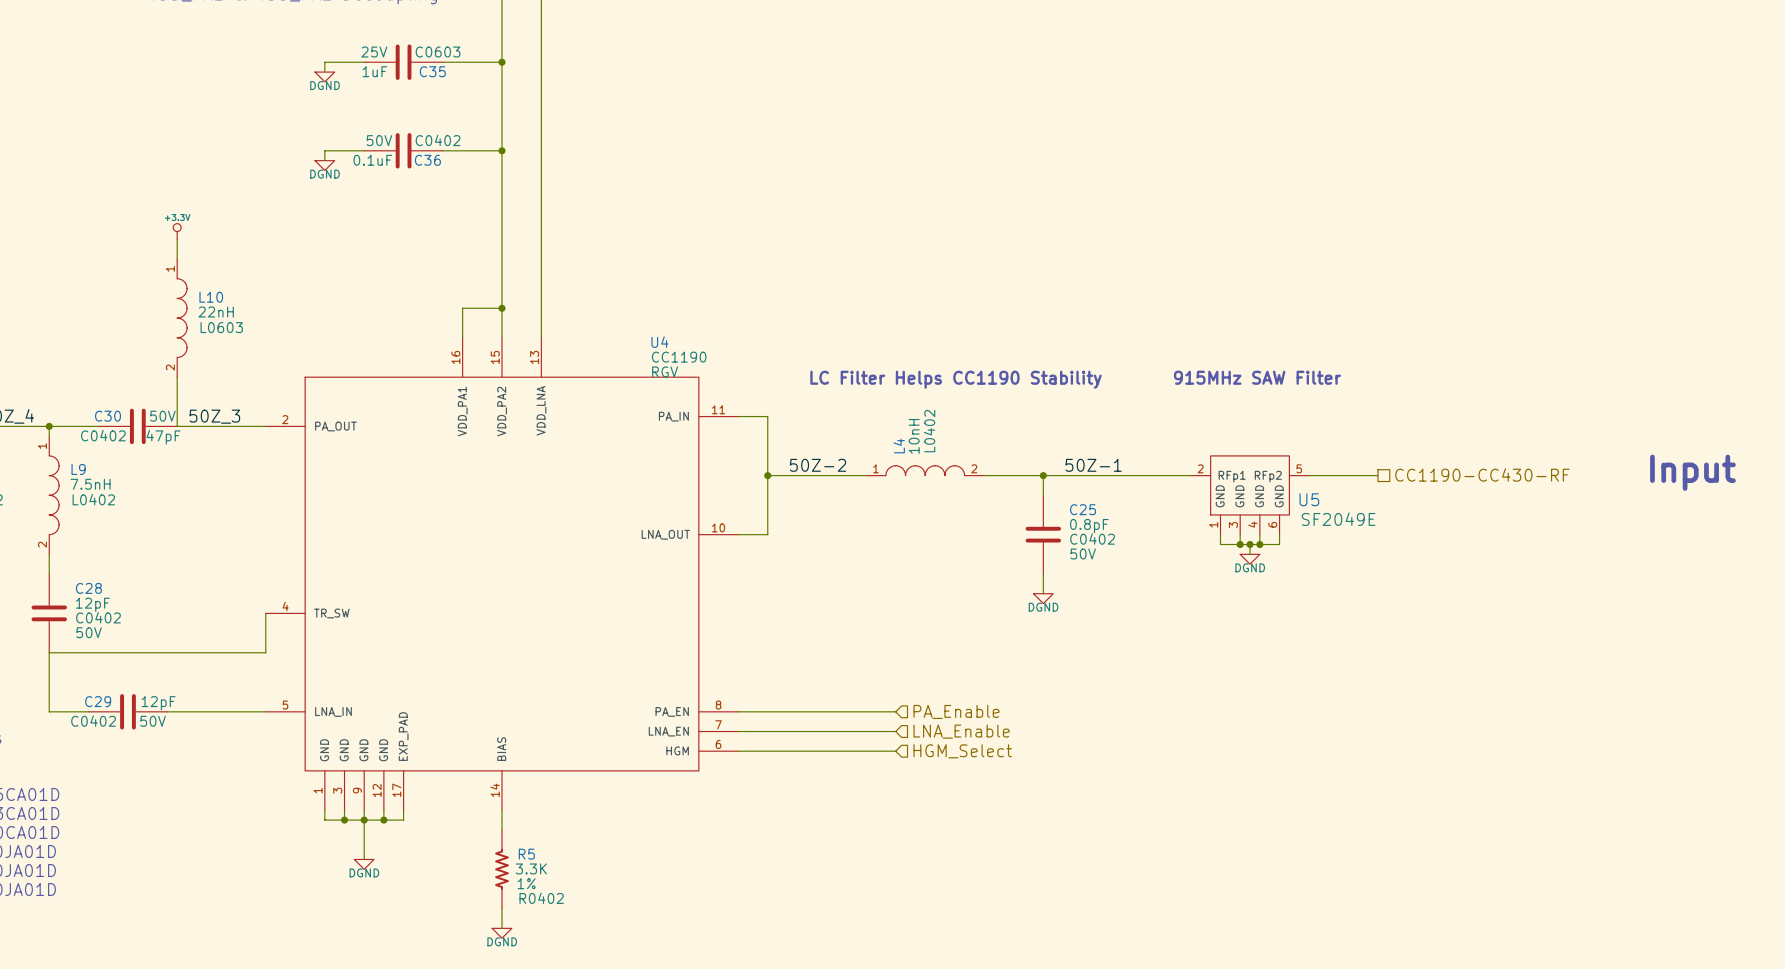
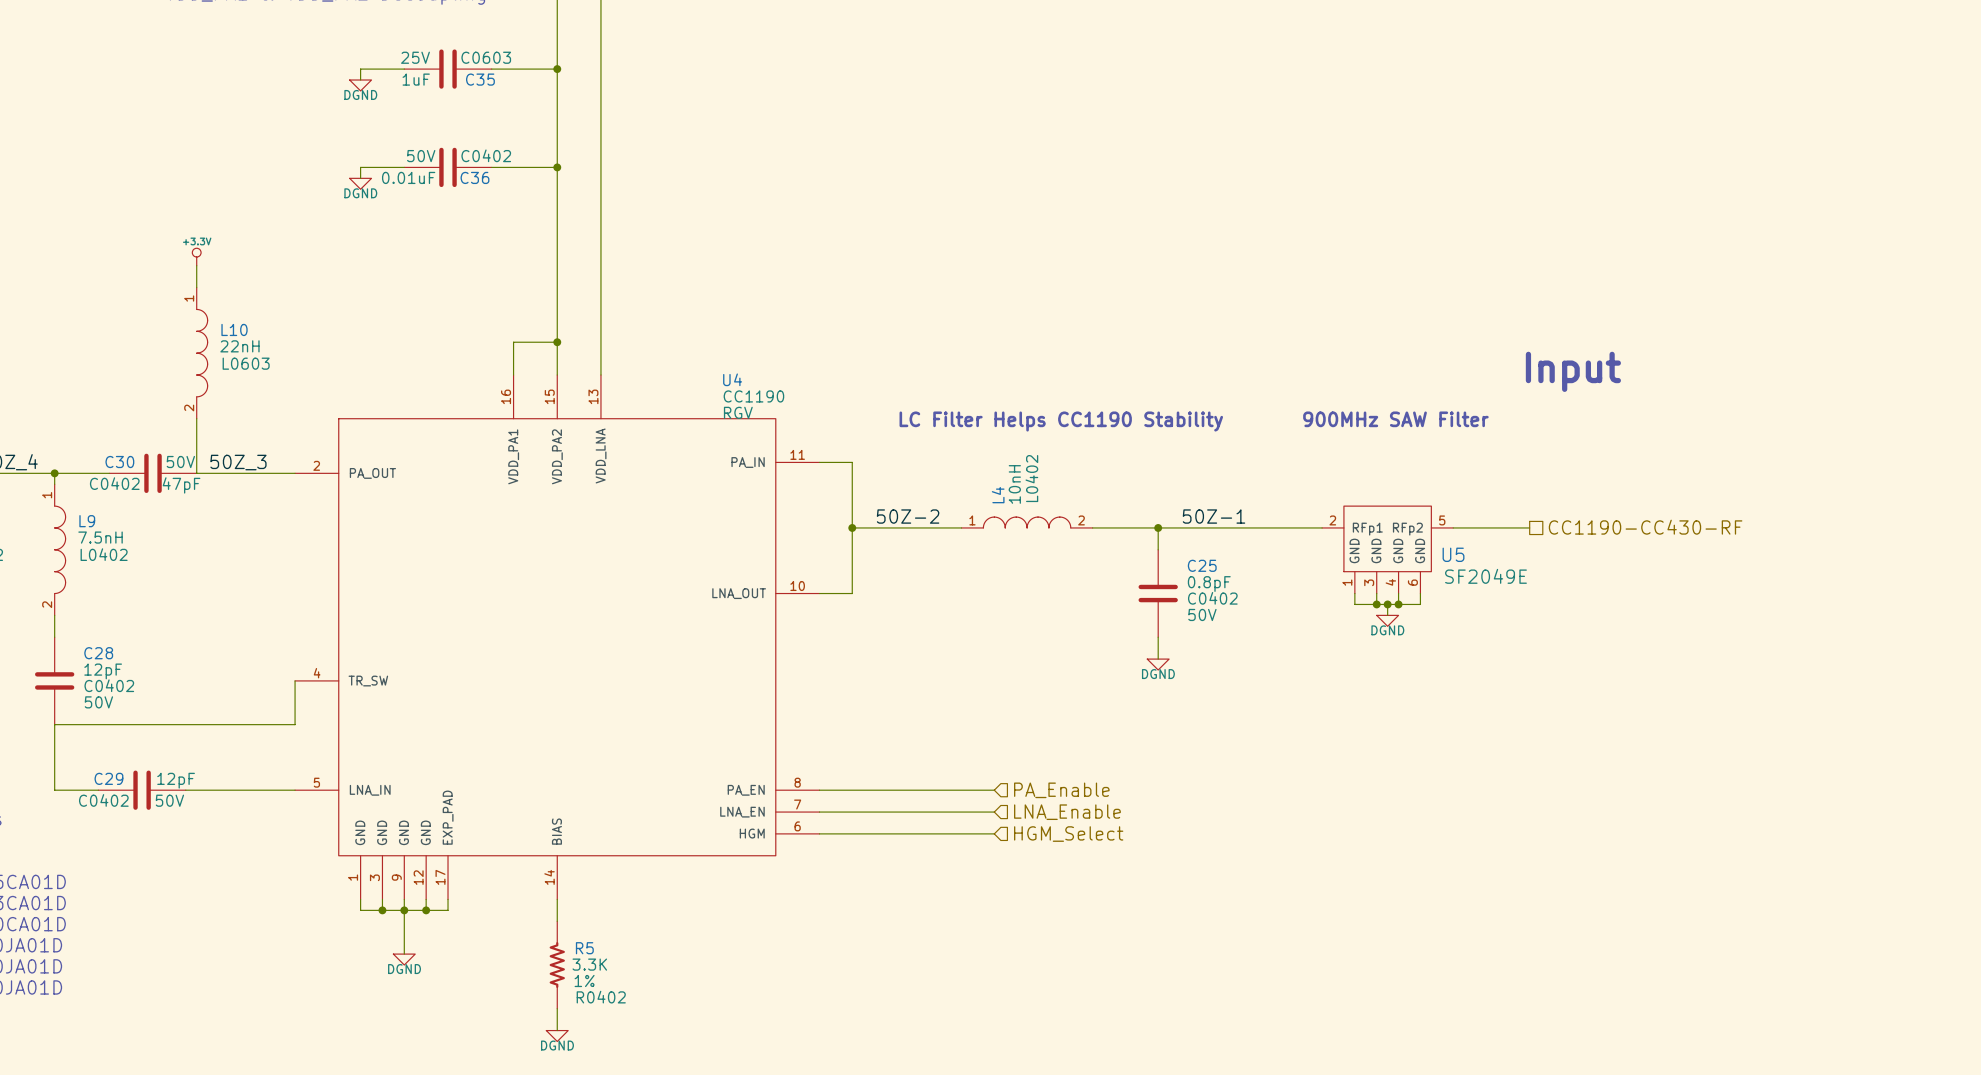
C36 value: 0.1uF (372, 160) -> 0.01uF (408, 177)
text: none -> Input (1573, 371)
text: 915MHz SAW Filter (1257, 377) -> 900MHz SAW Filter (1395, 419)
text: Input (1692, 472) -> none

